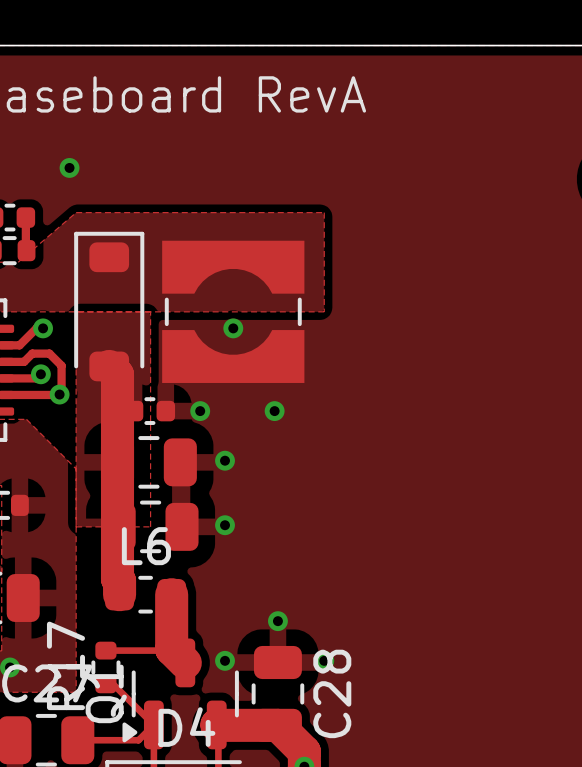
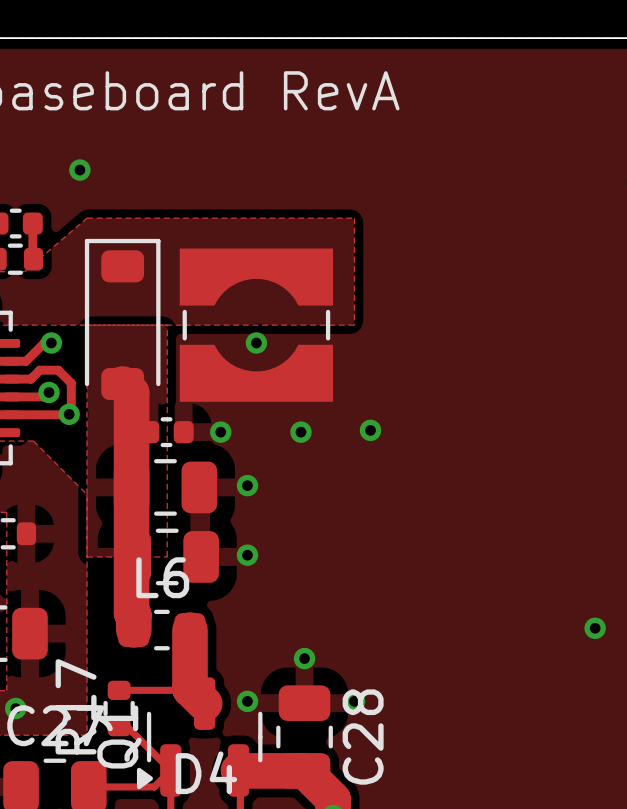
via: none -> (370, 430)
via: none -> (595, 628)

